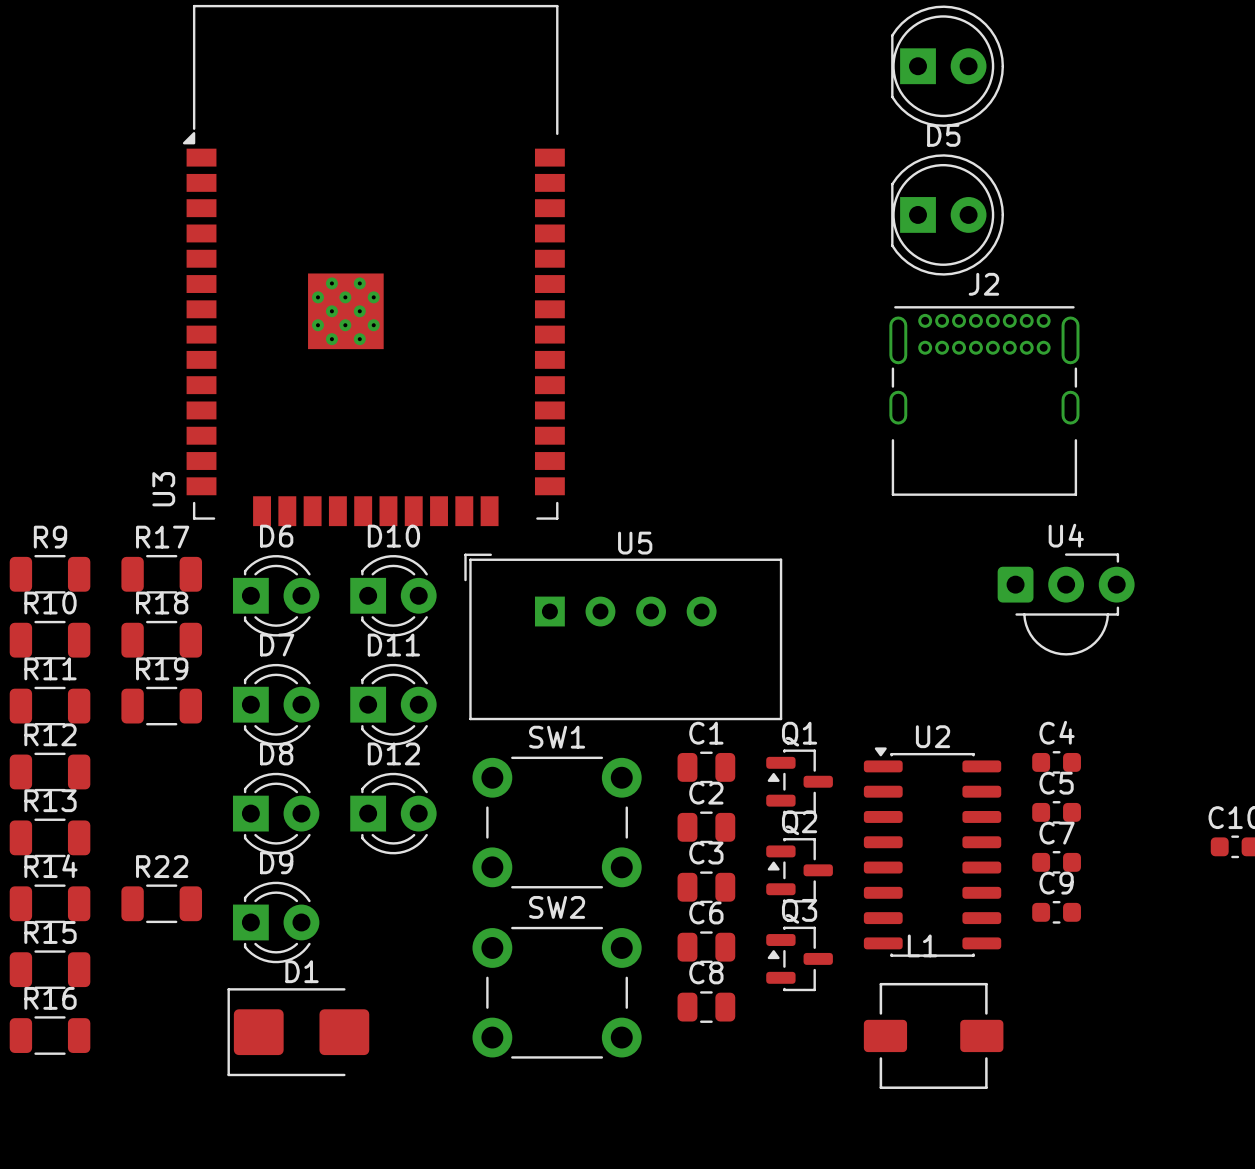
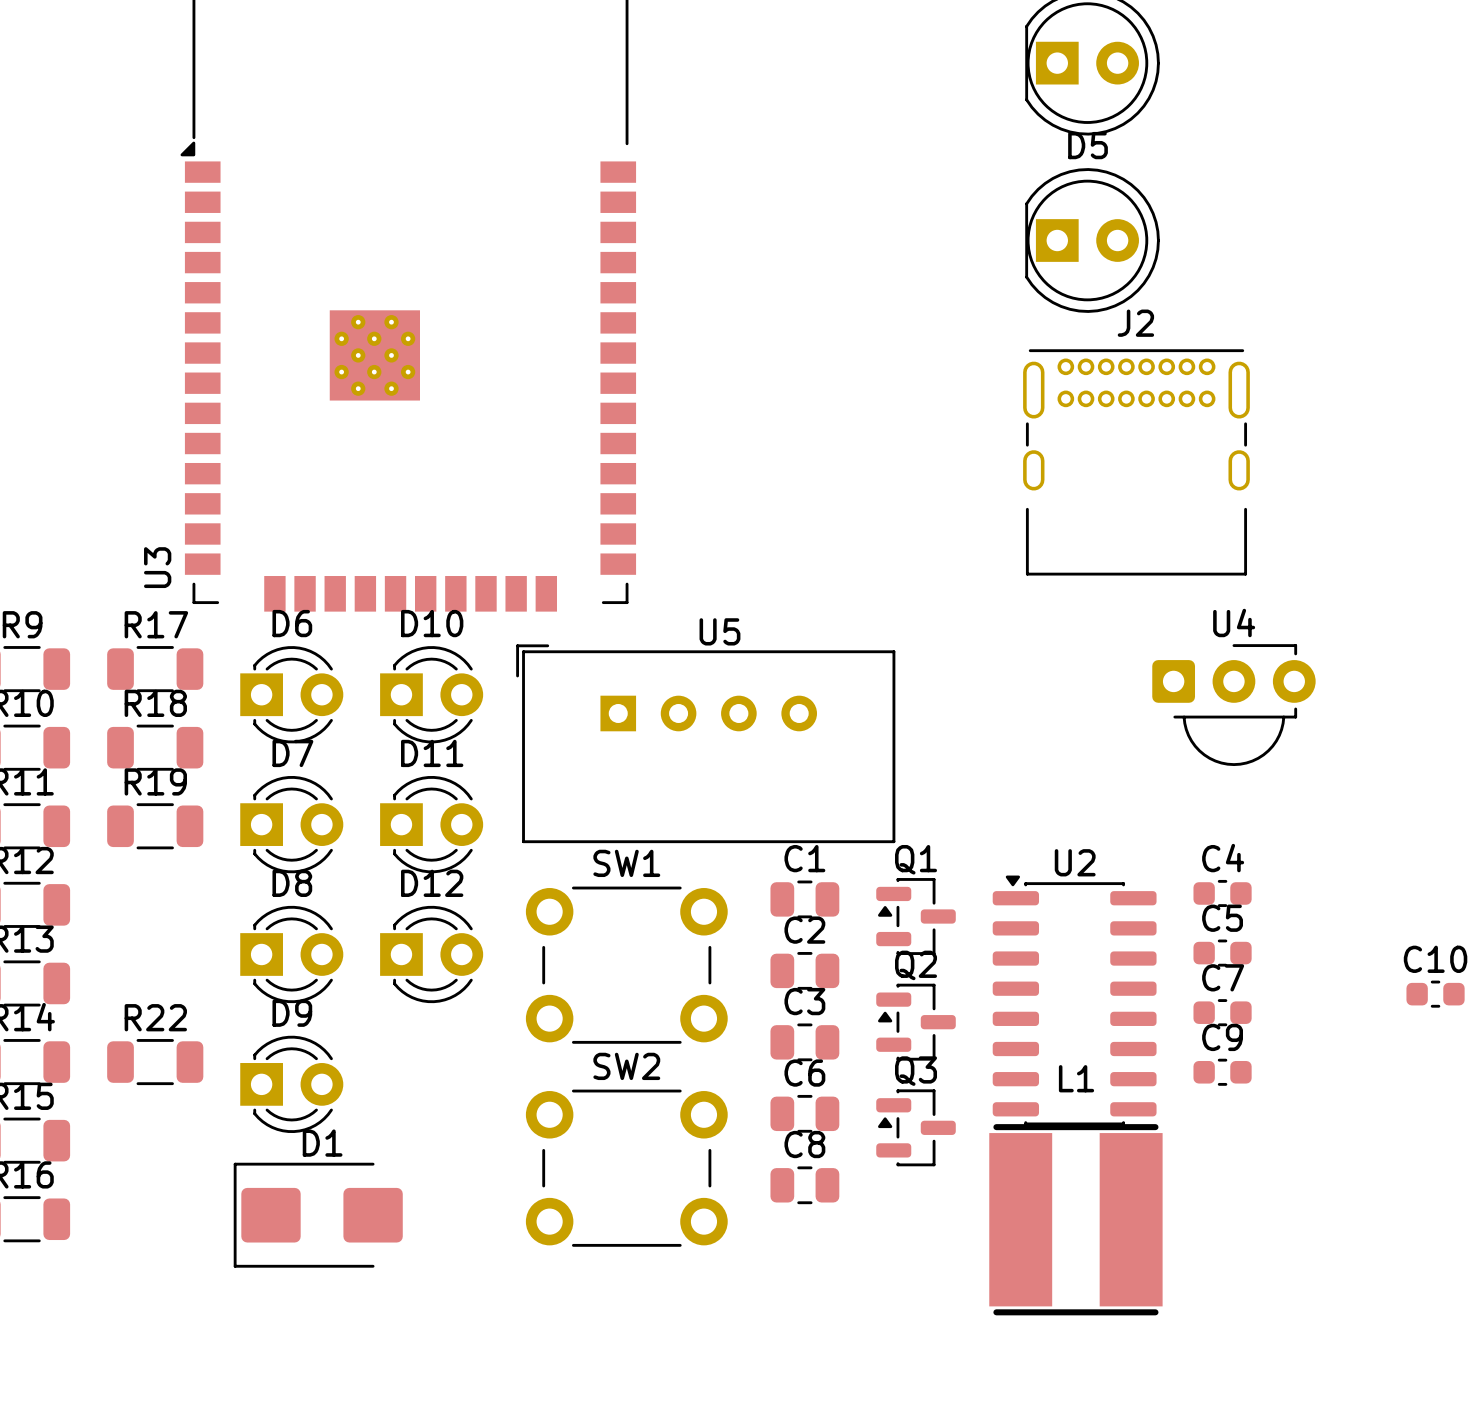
L1 footprint: [863, 982, 1004, 1089] -> [989, 1124, 1163, 1316]

